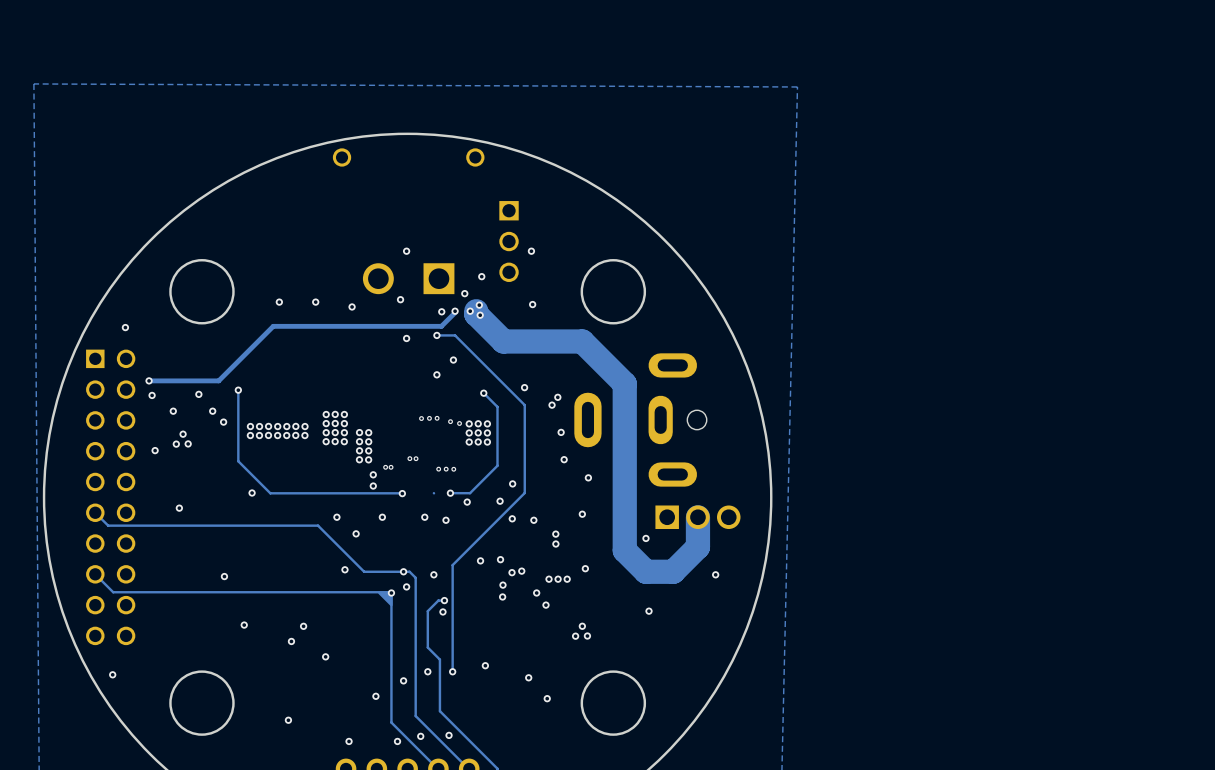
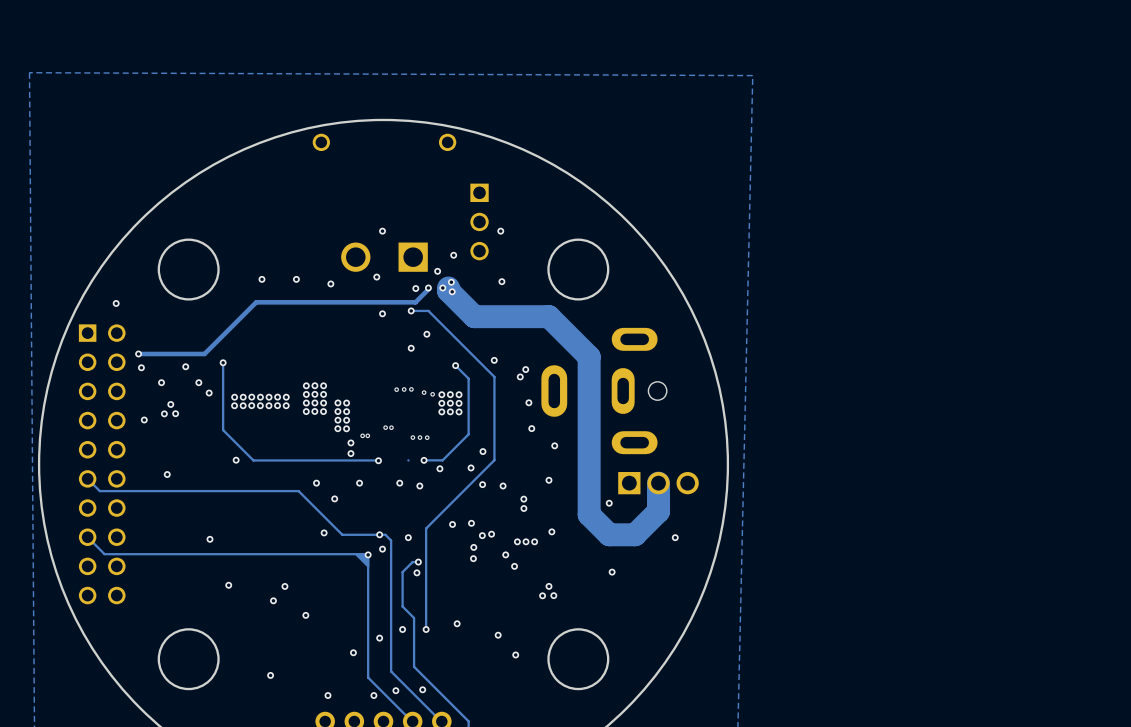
via: (112, 674) -> none

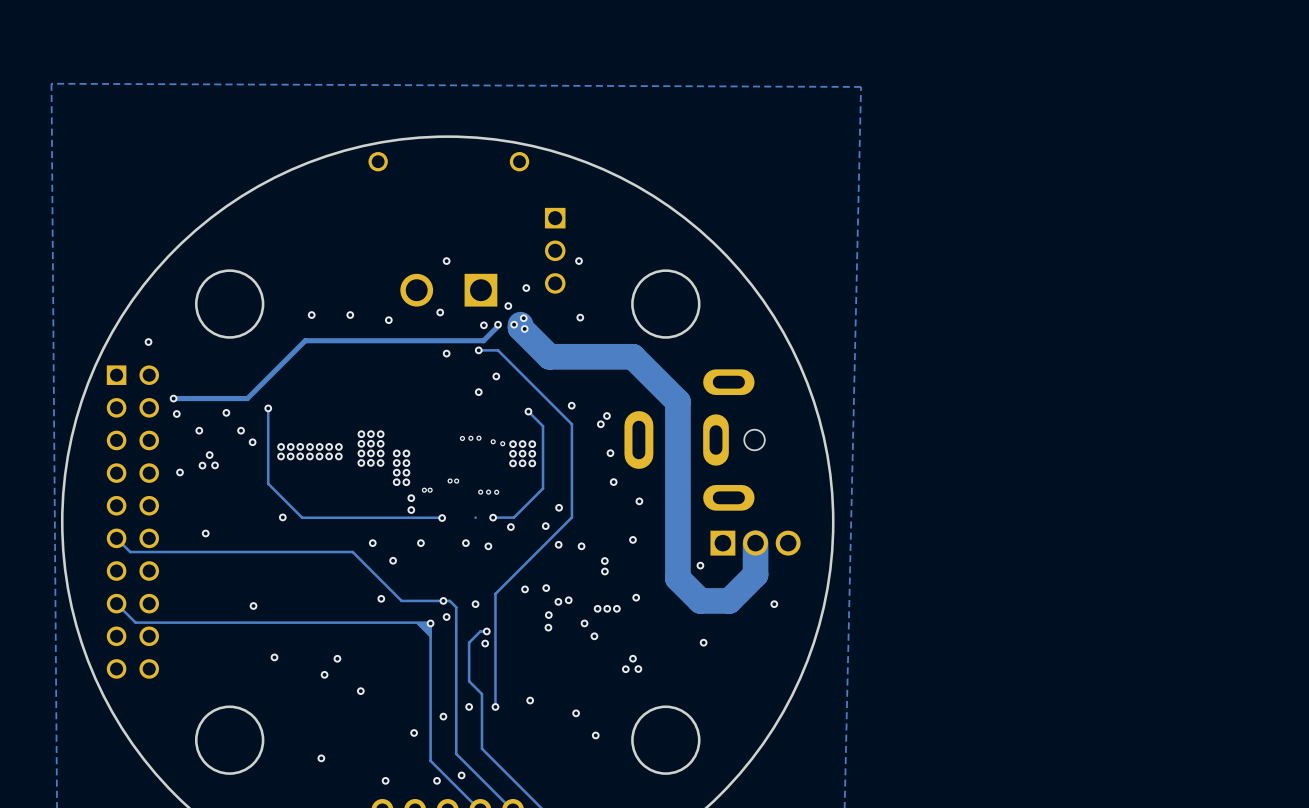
via: (422, 689) -> none

